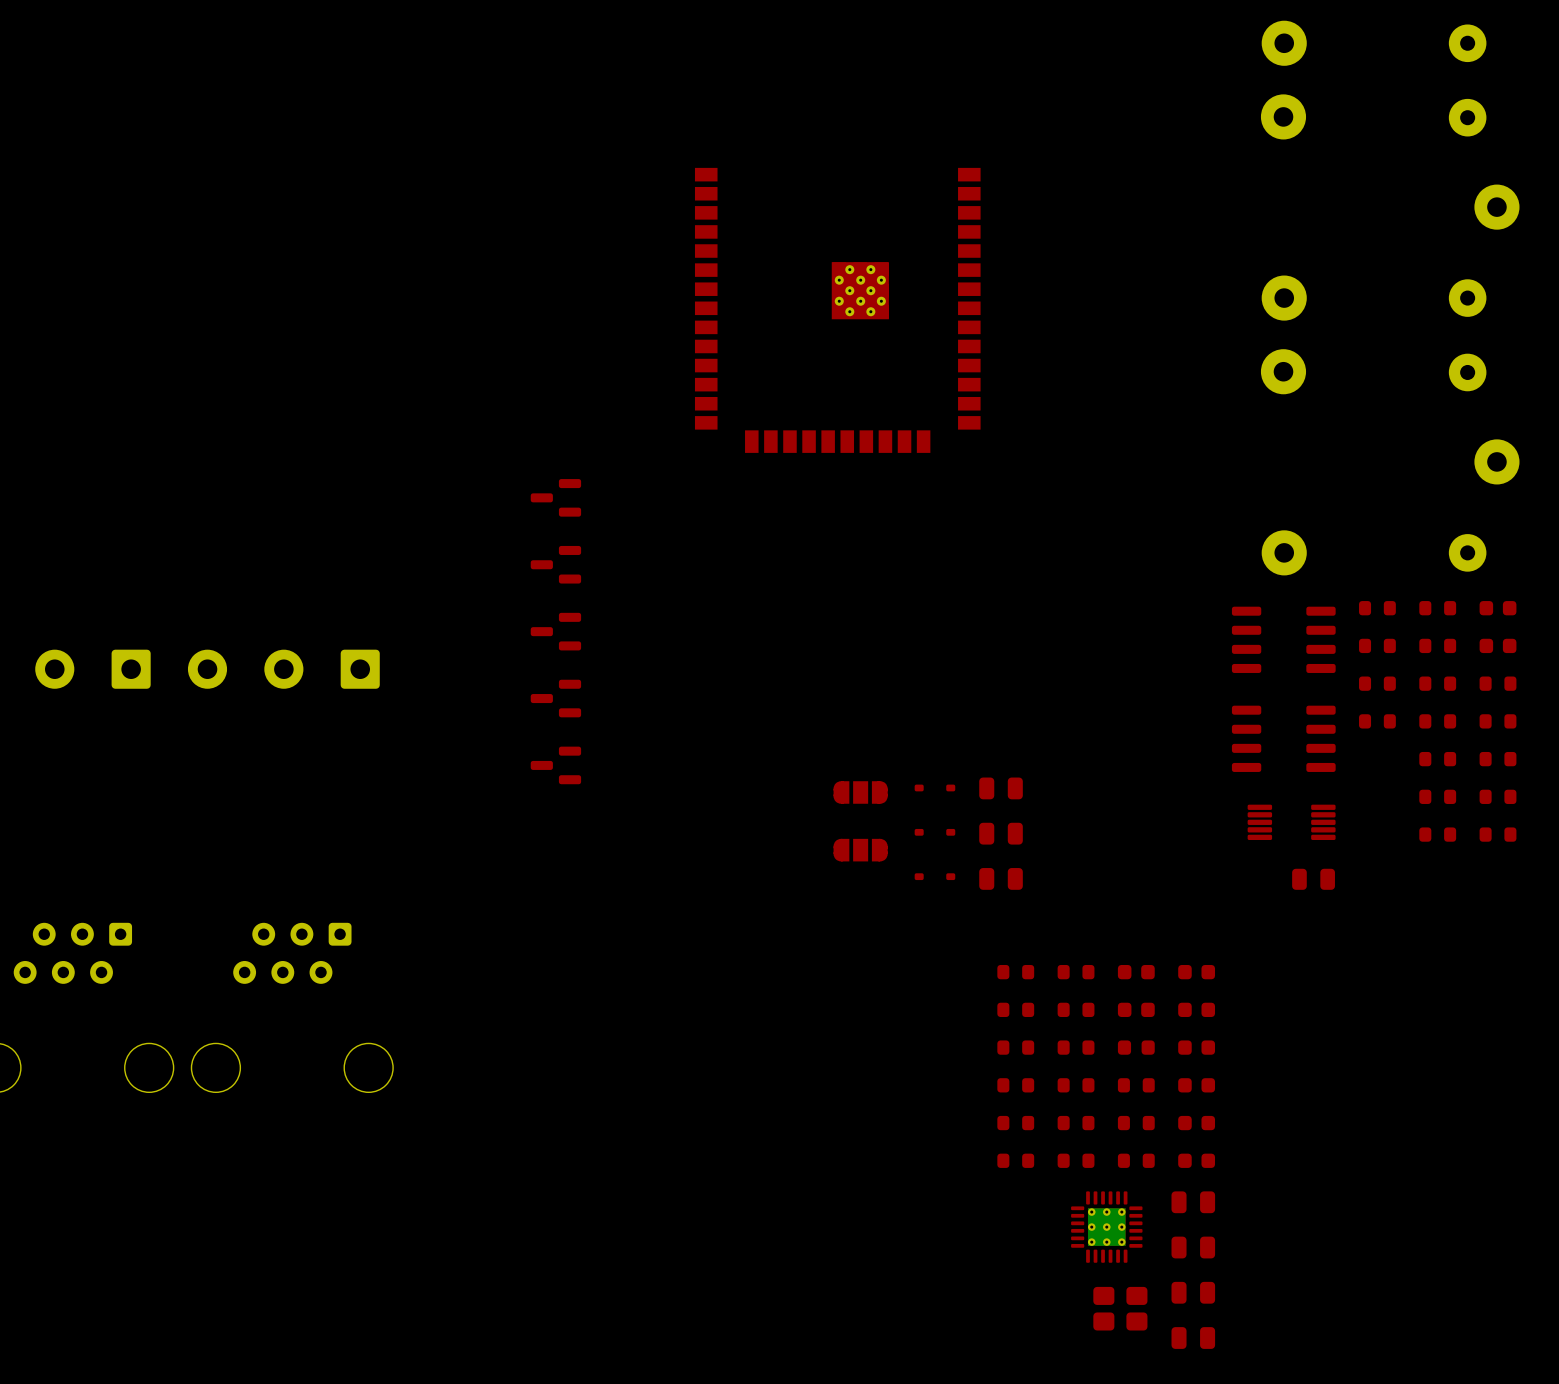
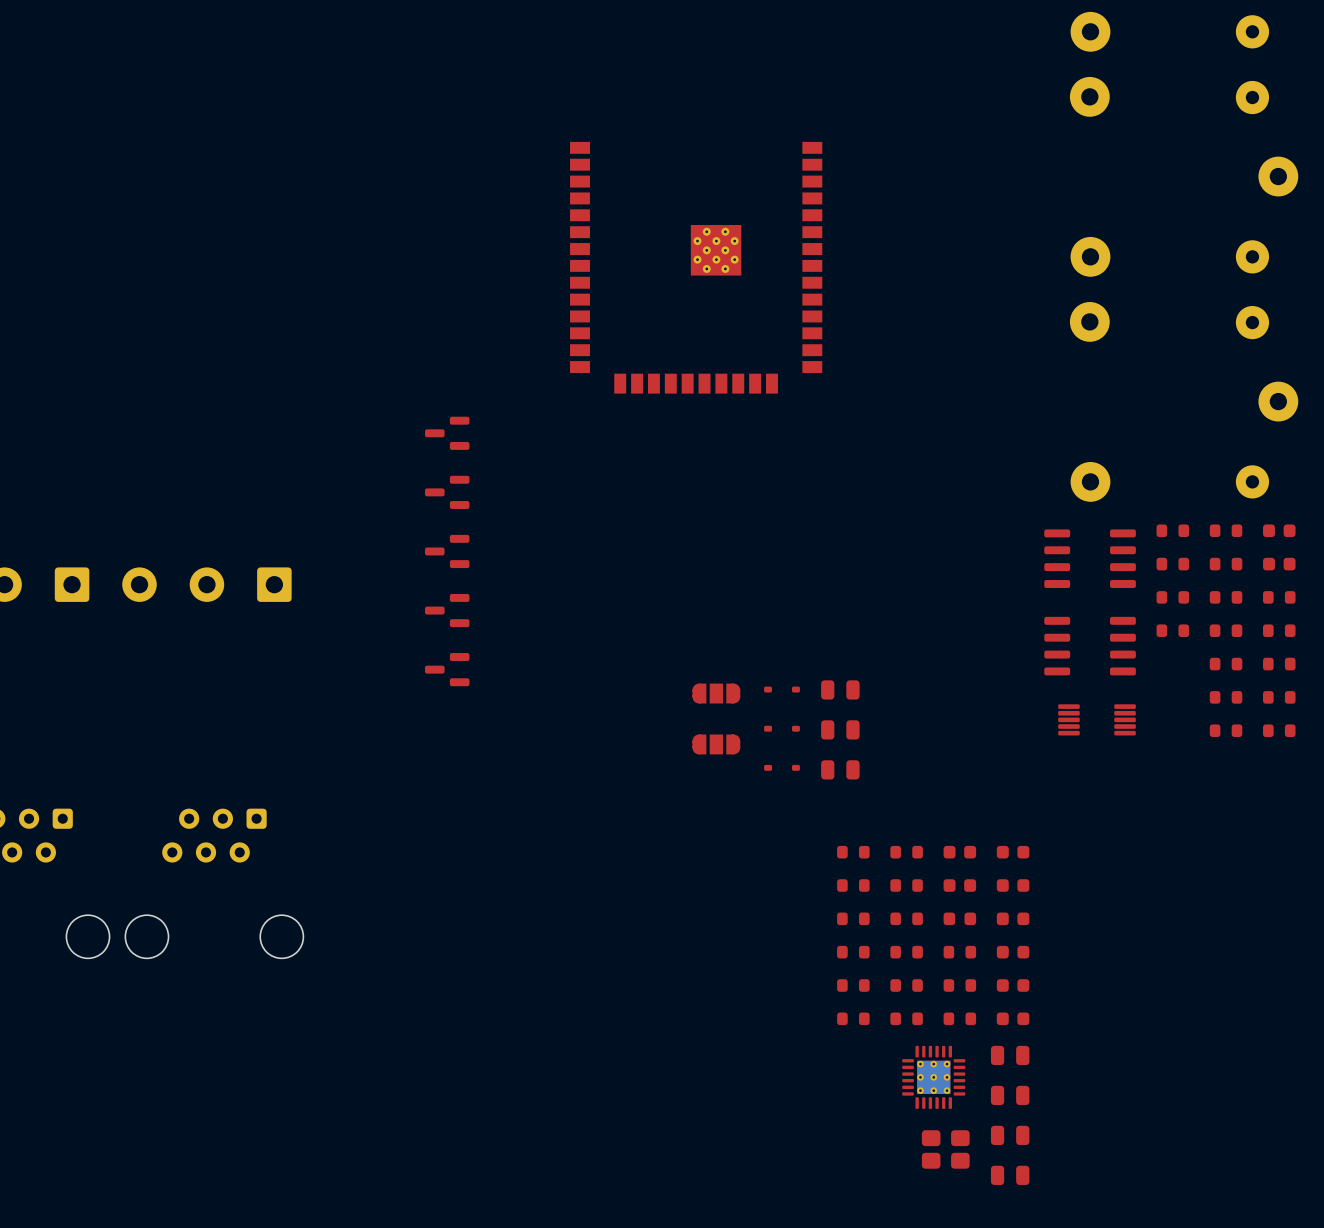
part: (1313, 879) -> none

